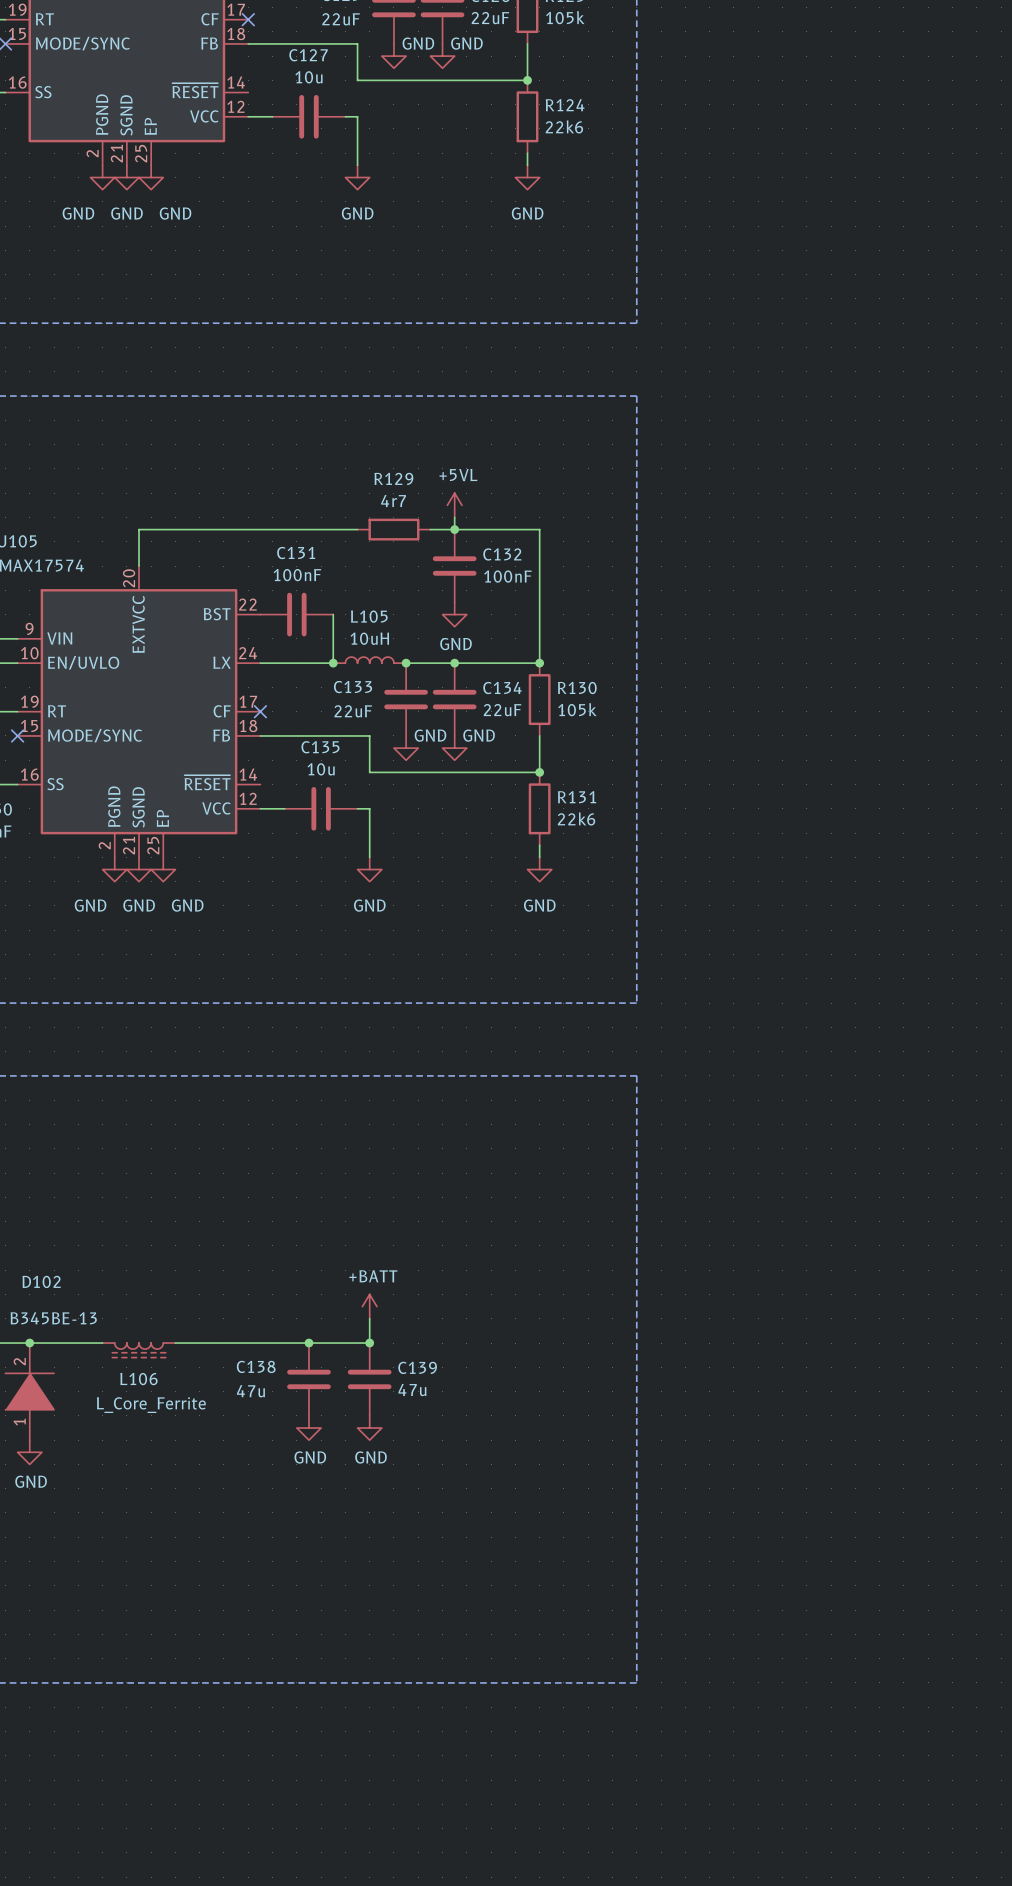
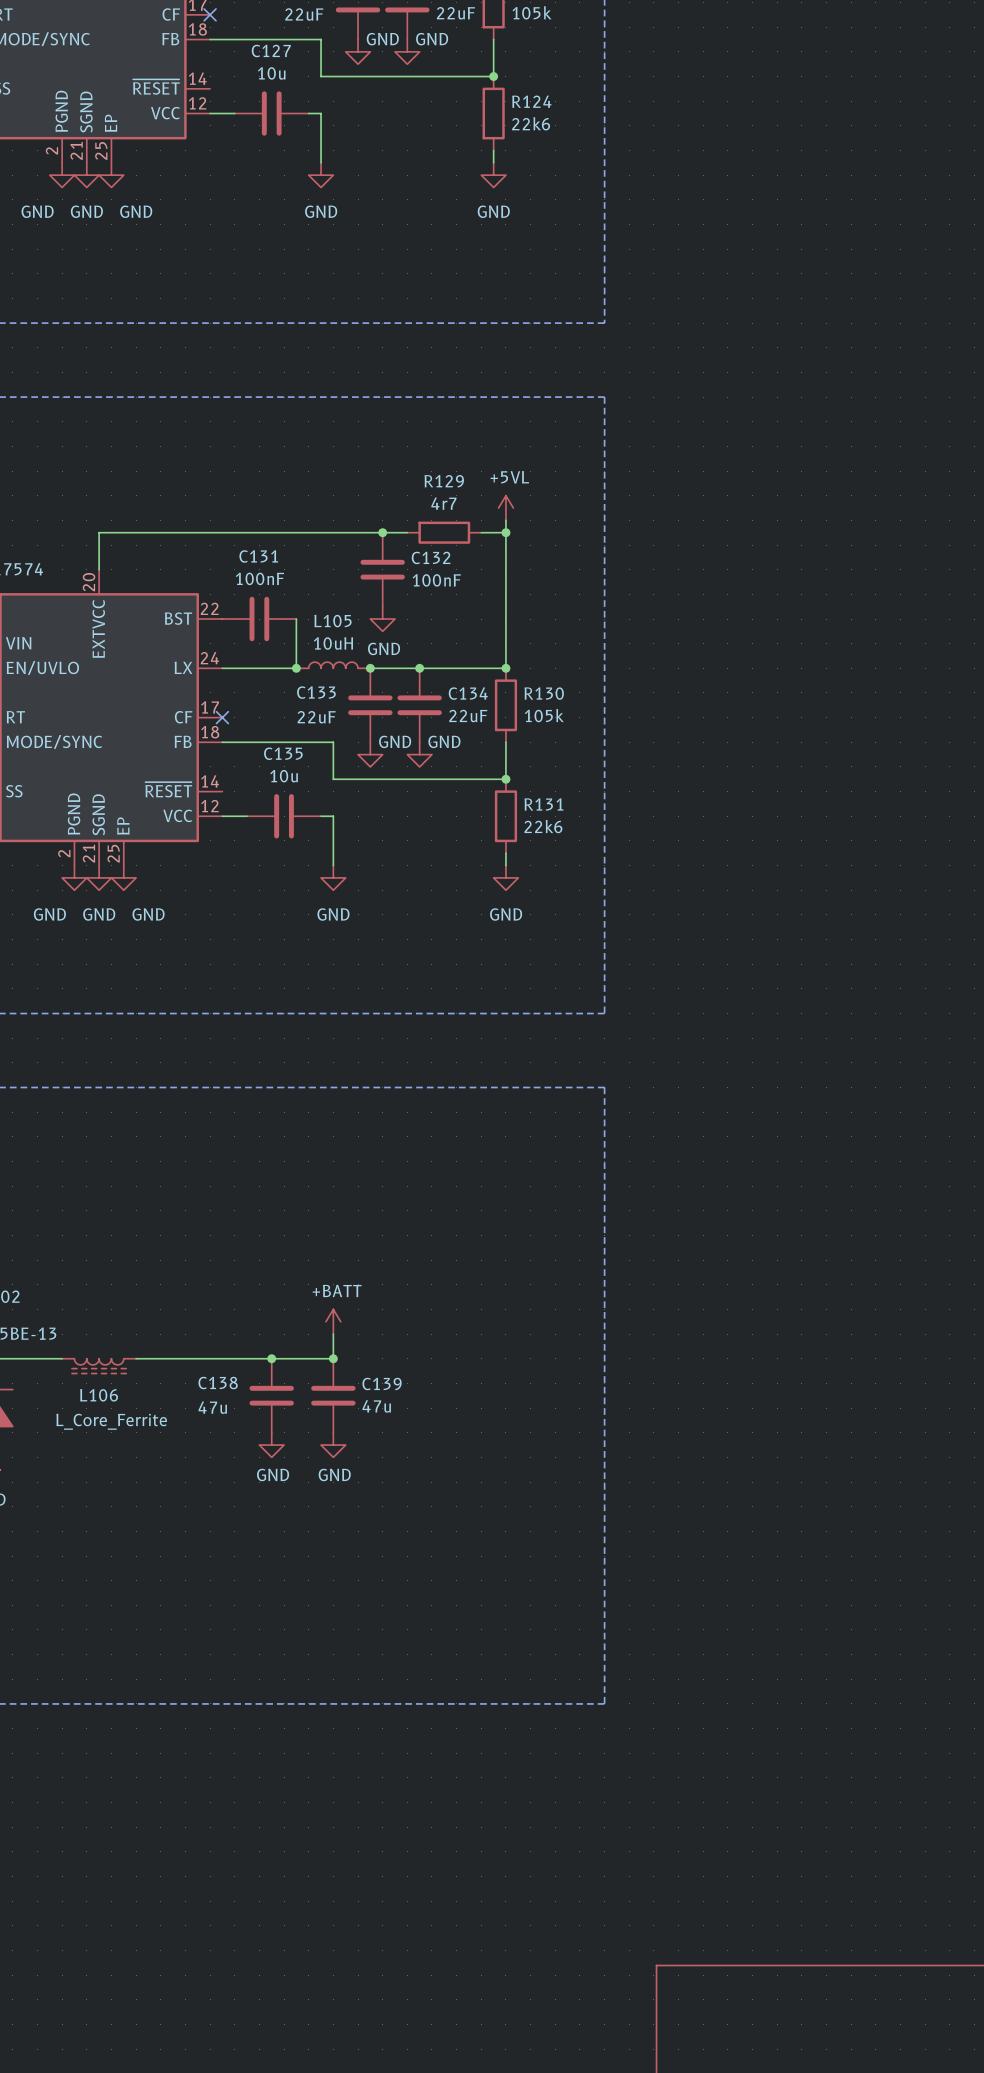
power symbol position: +5VL (454, 505) -> +5VL (505, 508)
R129 position: (393, 529) -> (444, 532)
wire: (442, 529) (515, 529) -> (321, 532) (395, 532)
junction position: (454, 529) -> (382, 532)
junction: none -> (505, 532)
C132 position: (454, 566) -> (382, 569)
power symbol position: GND (454, 614) -> GND (382, 619)

